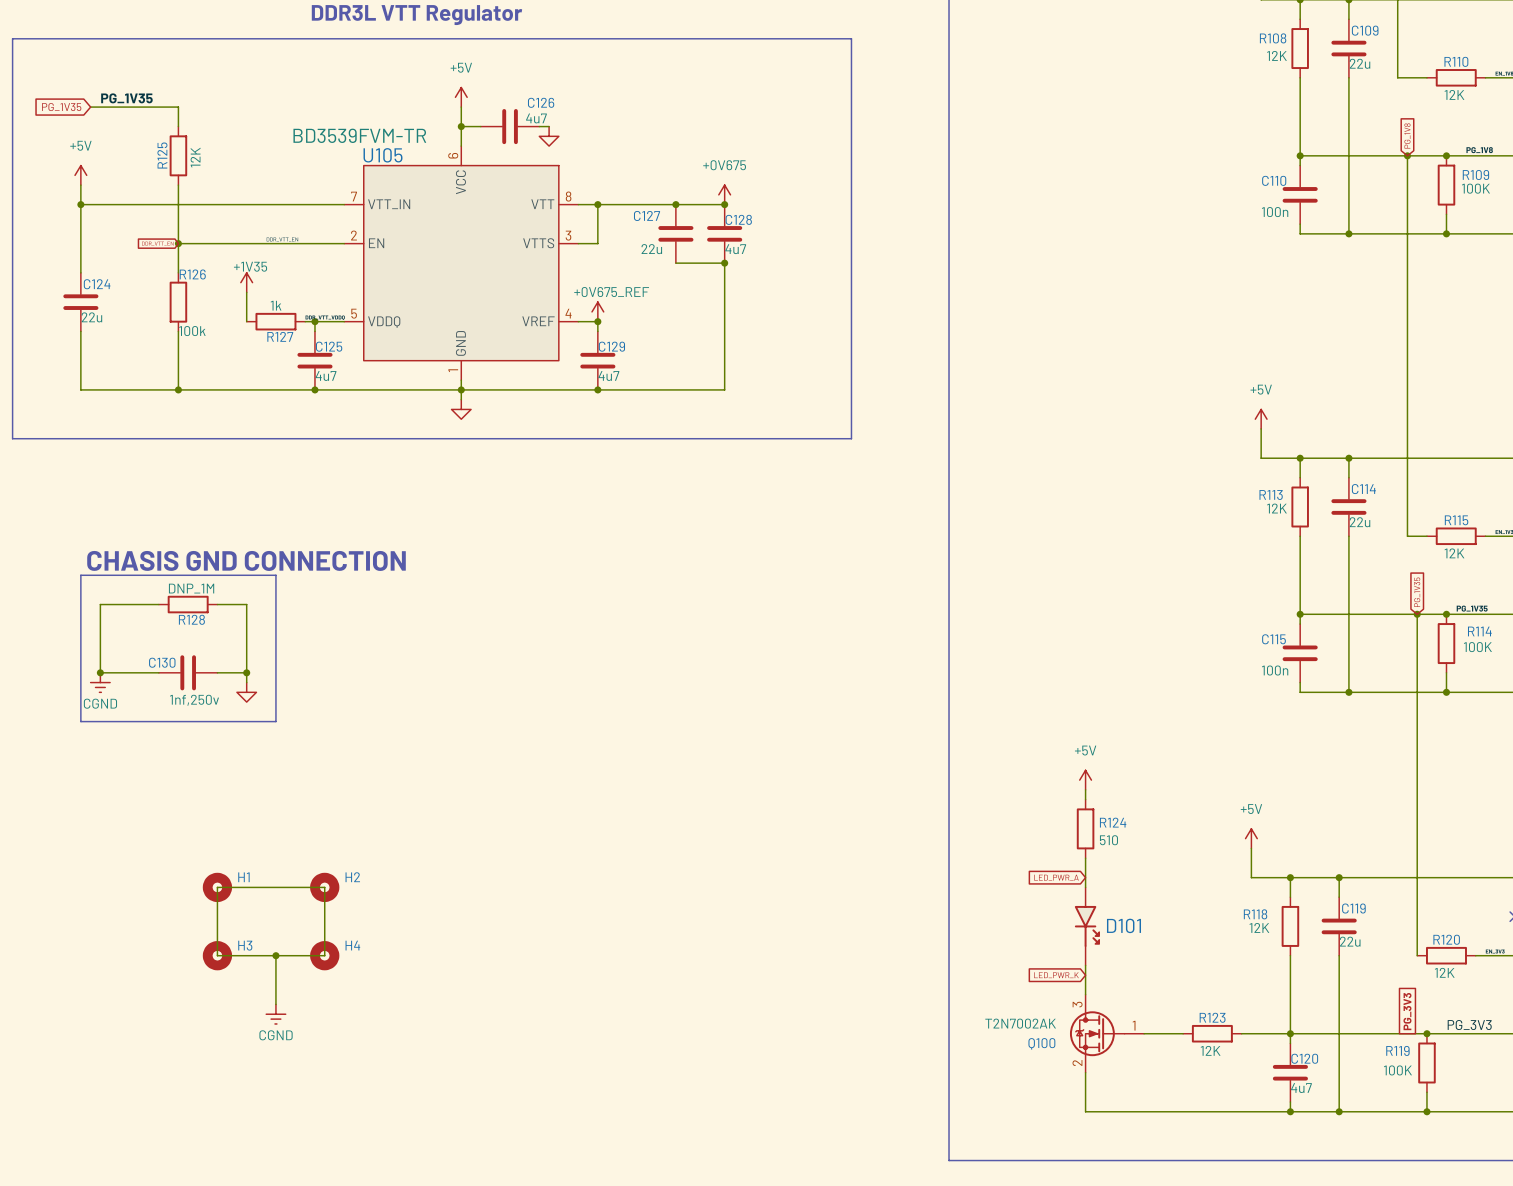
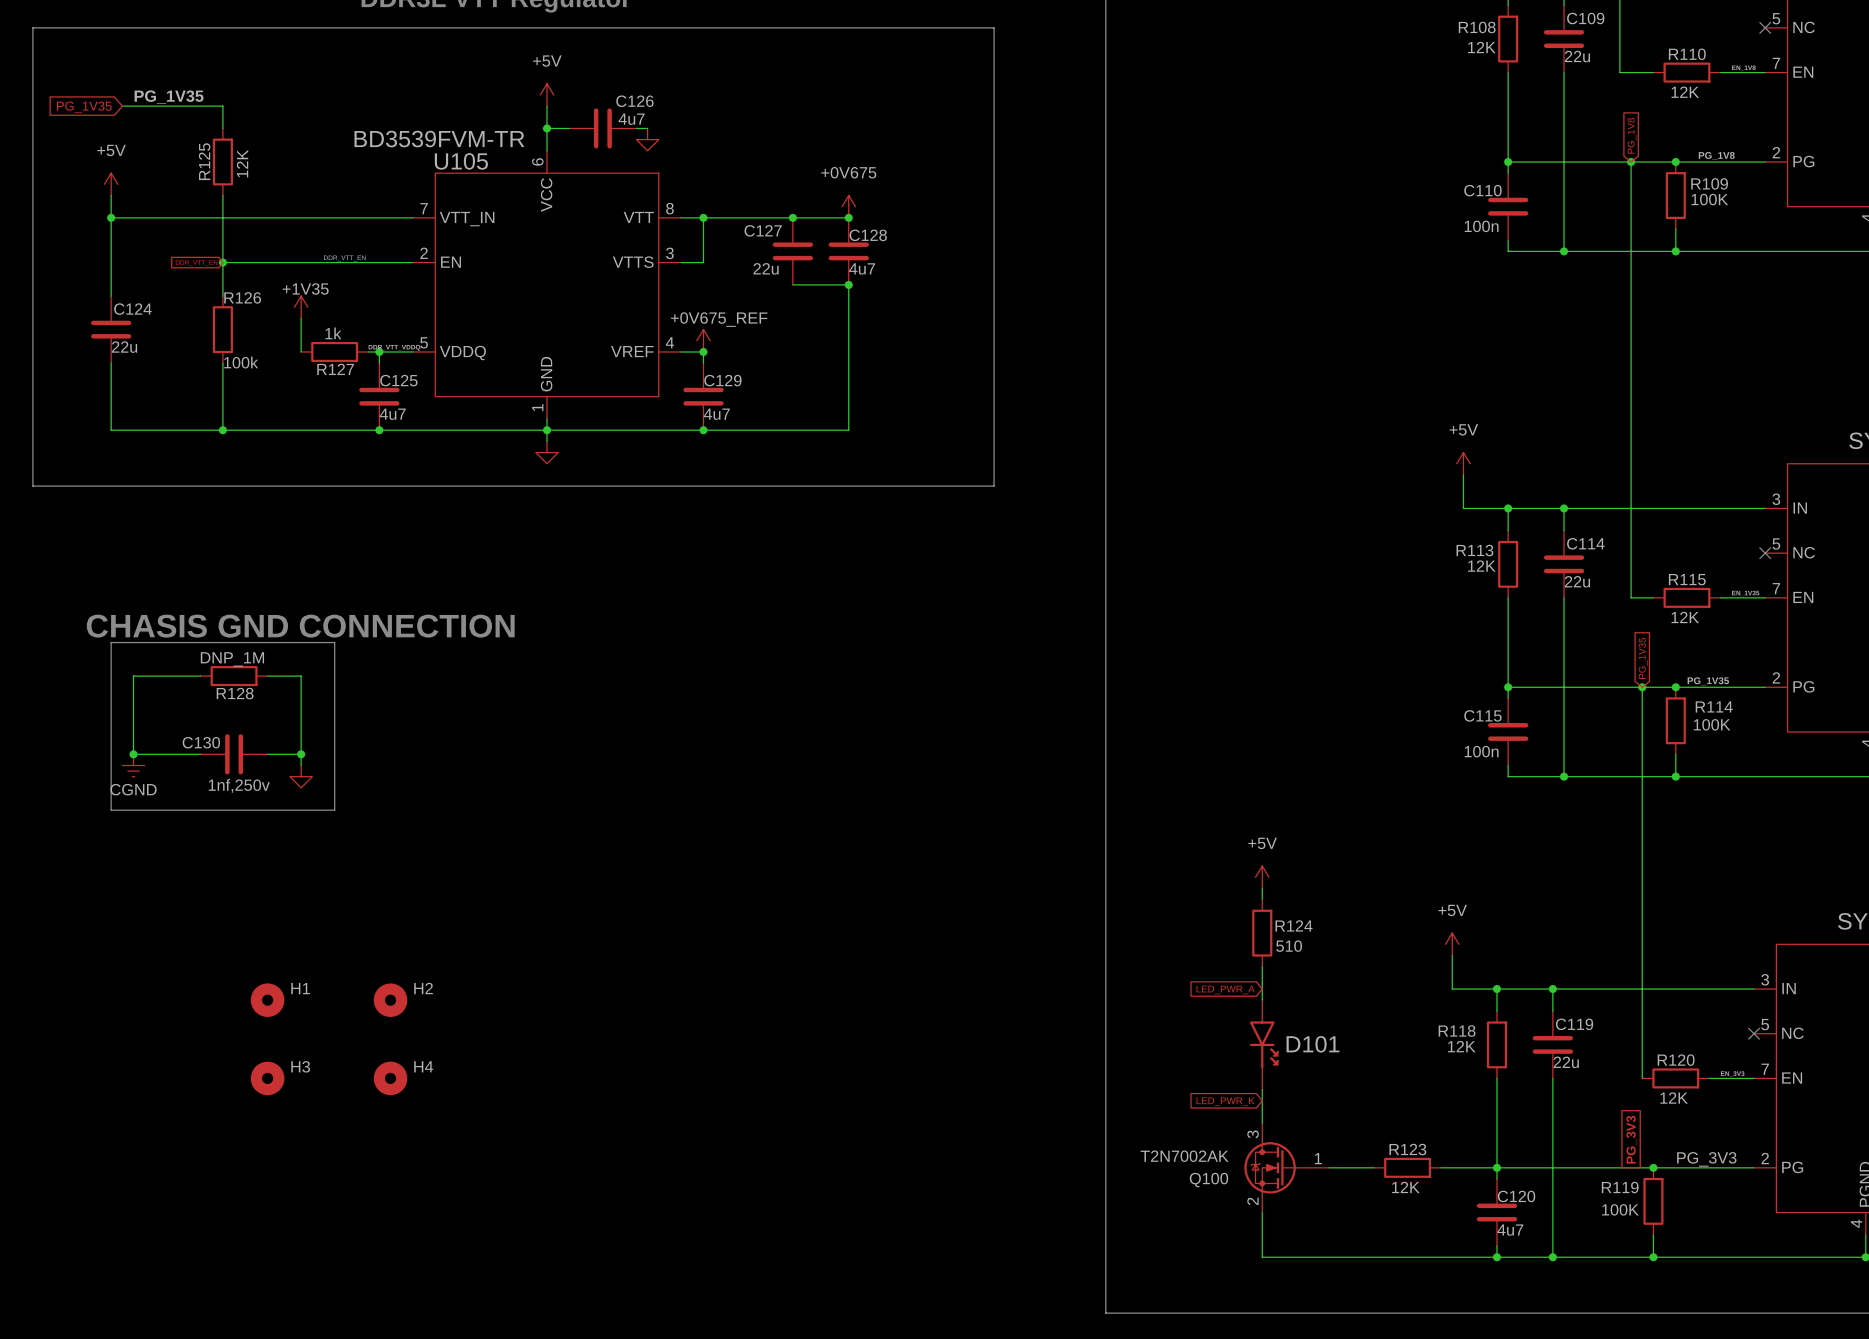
wire: (217, 887) (217, 955) (324, 955) (324, 887) (217, 887) -> none
wire: (275, 955) (275, 1004) -> none
junction: (275, 955) -> none
power symbol: CGND (275, 1014) -> none

